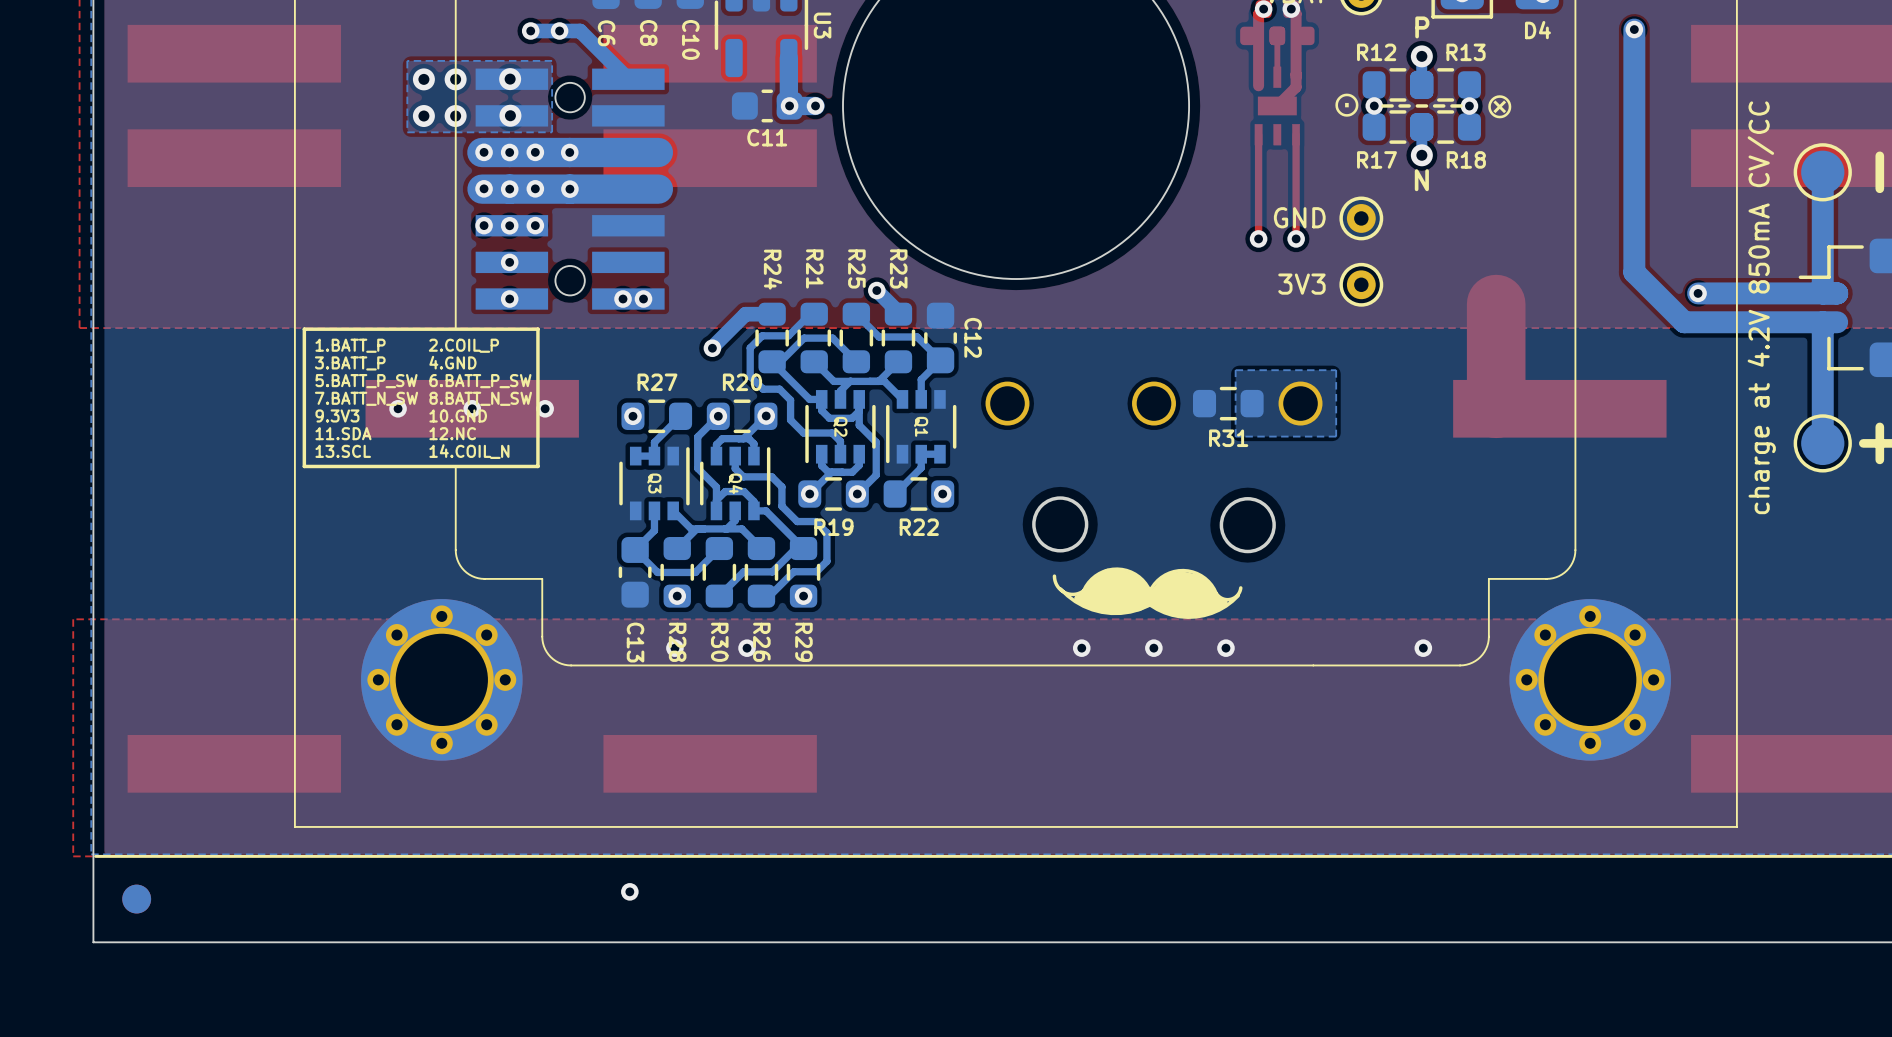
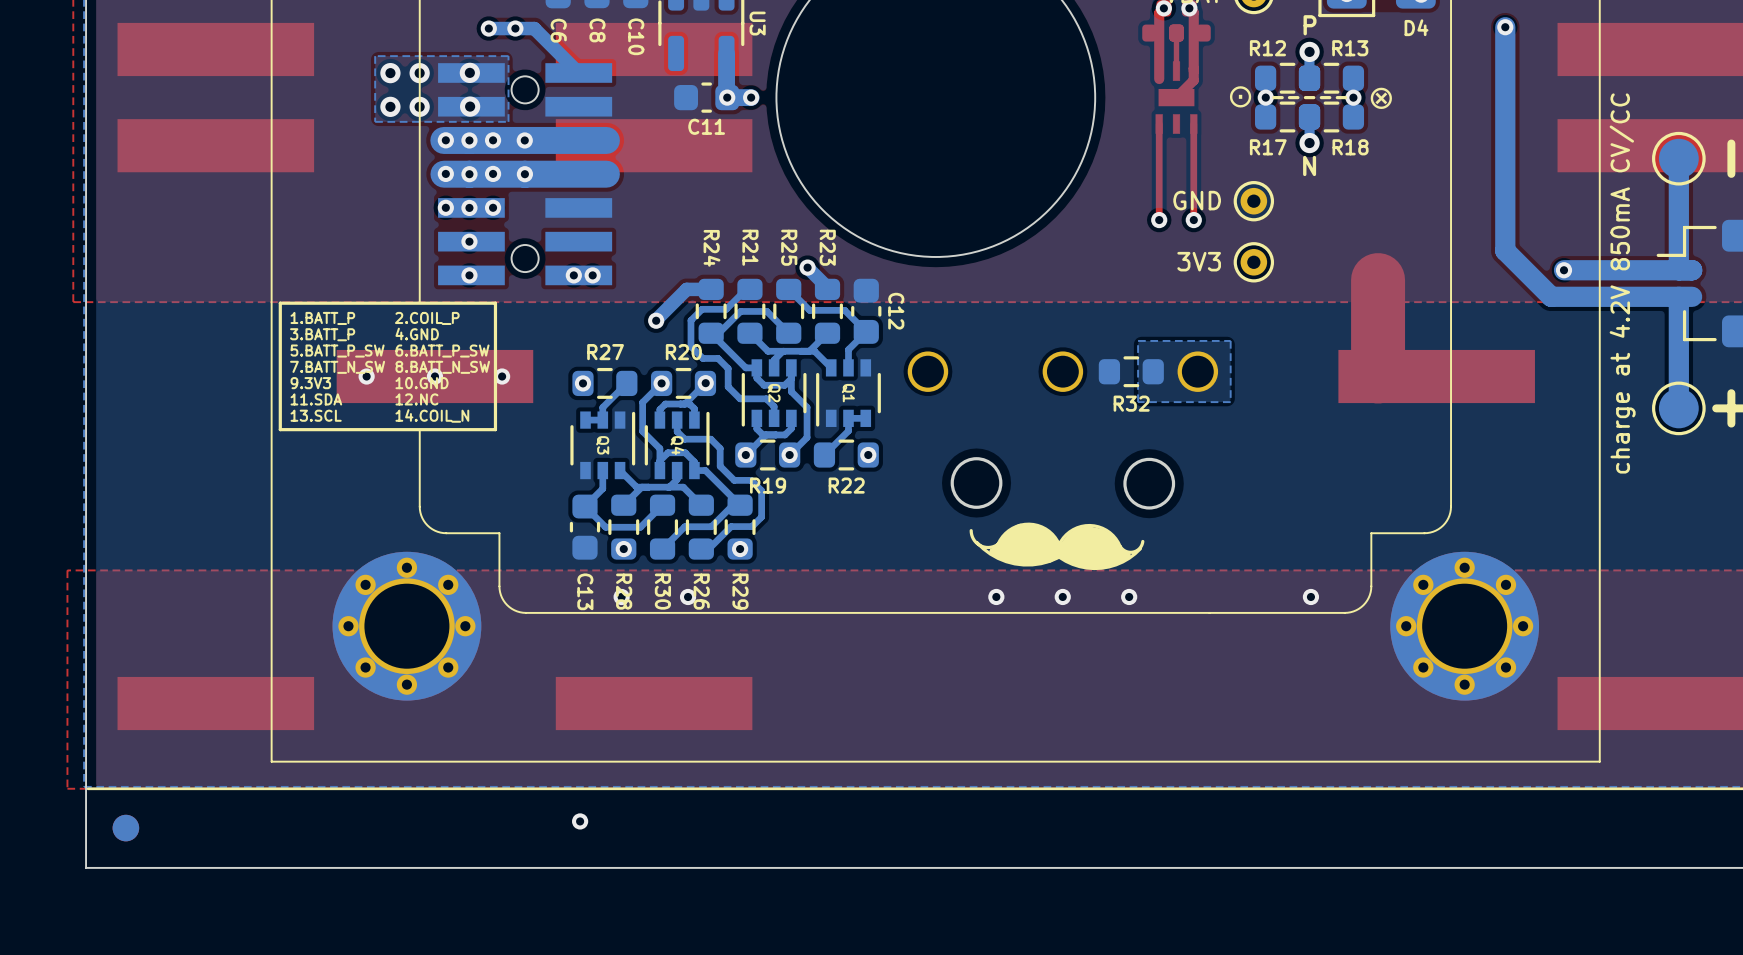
R31 name: R31 (1228, 438) -> R32 (1131, 403)

